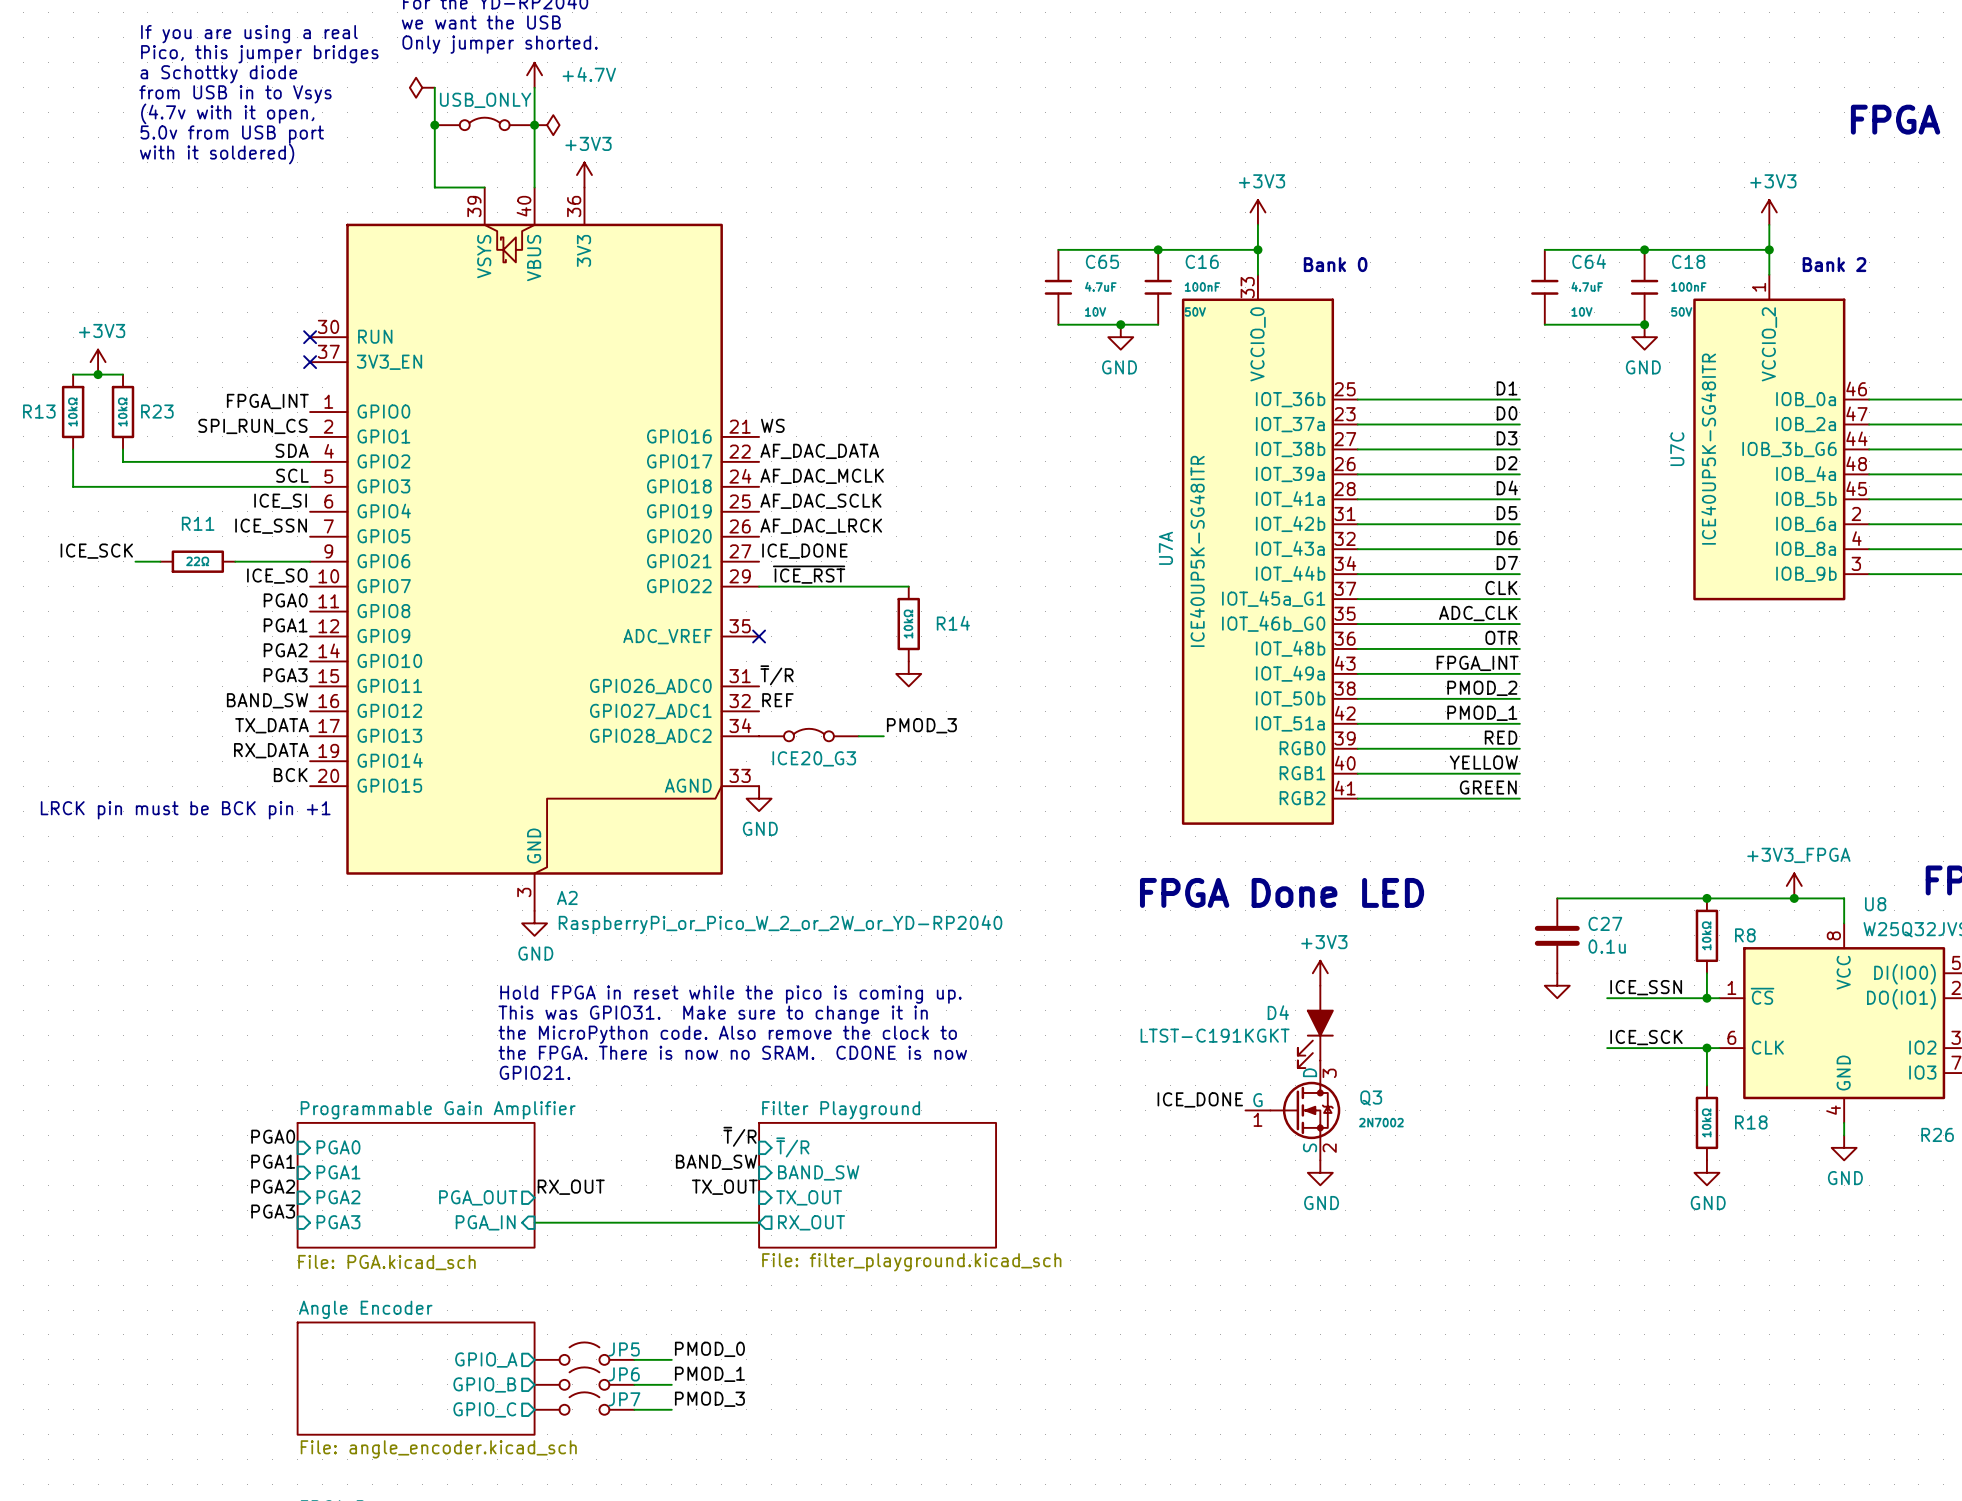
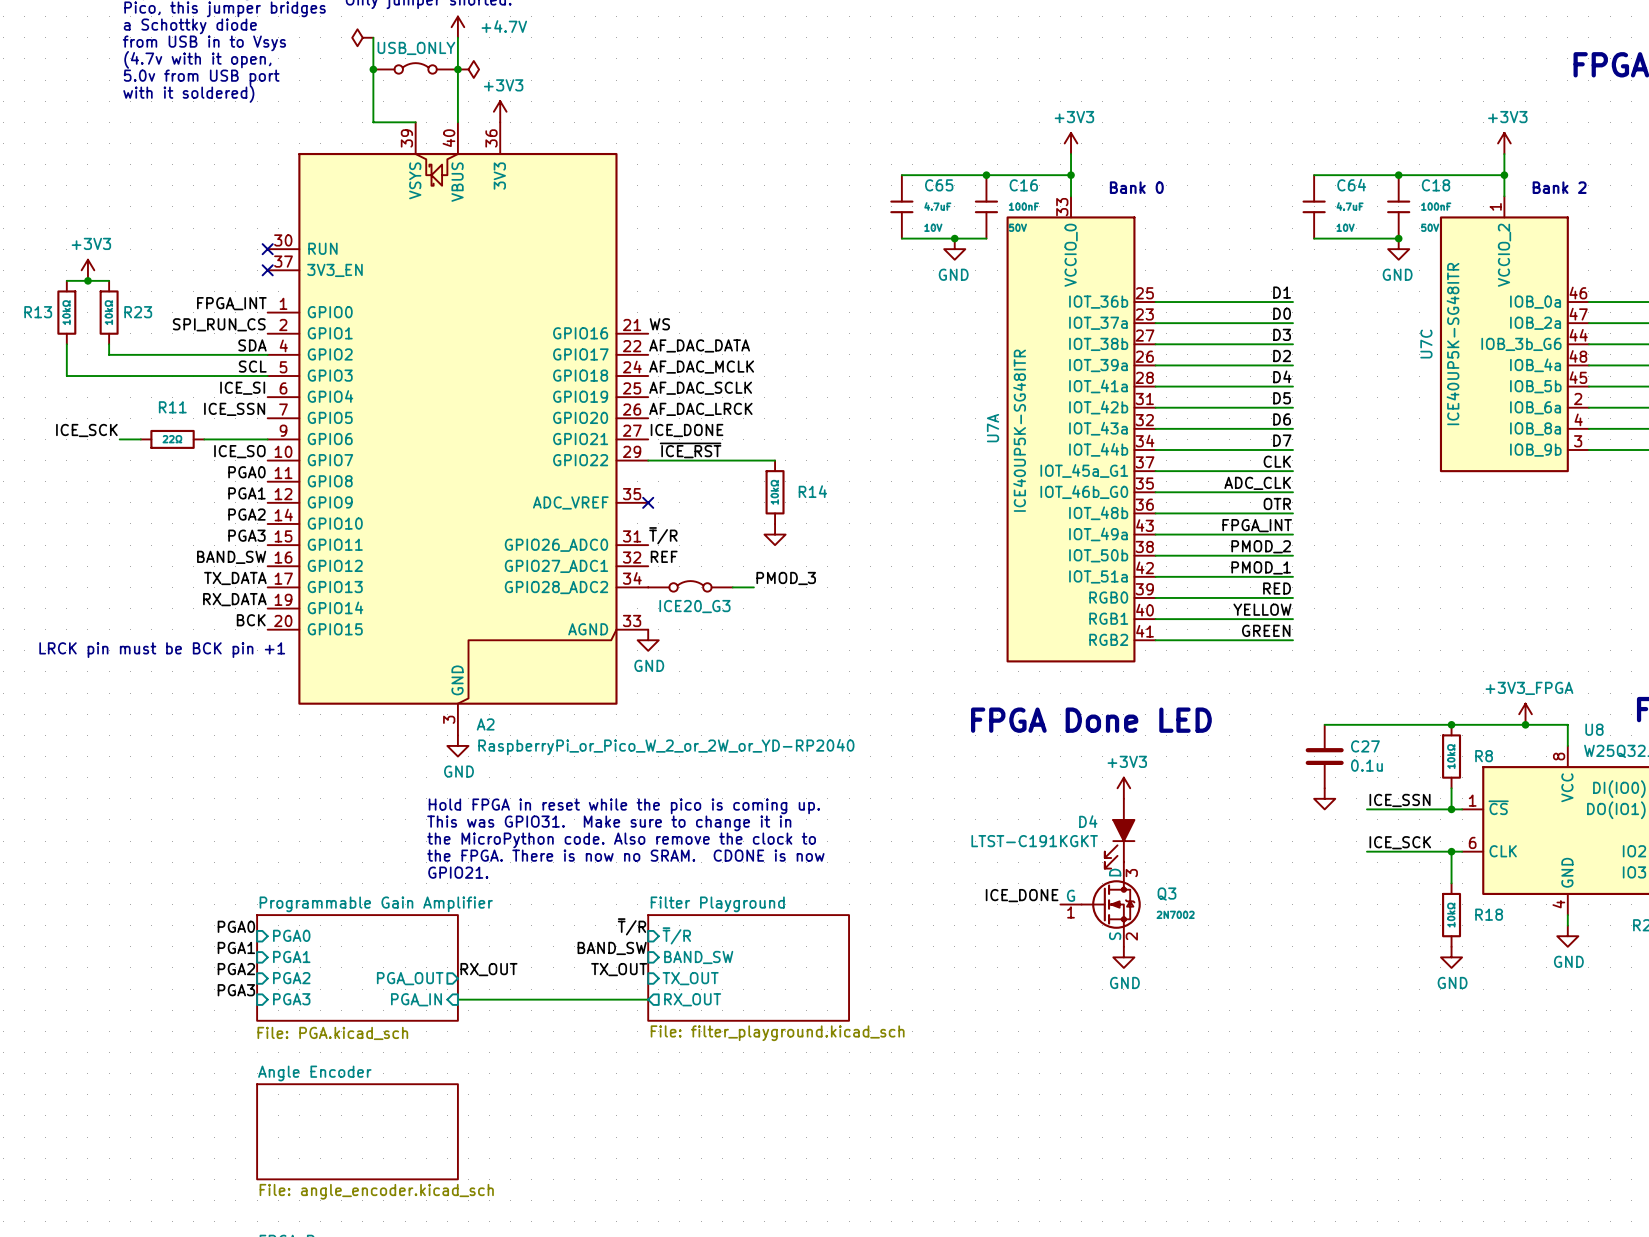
label: PMOD_0 (709, 1349) -> none
JP5: (584, 1353) -> none
wire: (634, 1359) (671, 1359) -> none
sheet pin: GPIO_A (486, 1360) -> none
label: PMOD_1 (709, 1374) -> none
JP6: (584, 1378) -> none
sheet pin: GPIO_B (484, 1384) -> none
wire: (634, 1384) (671, 1384) -> none
label: PMOD_3 (709, 1399) -> none
JP7: (584, 1403) -> none
sheet pin: GPIO_C (484, 1409) -> none
wire: (634, 1409) (671, 1409) -> none

